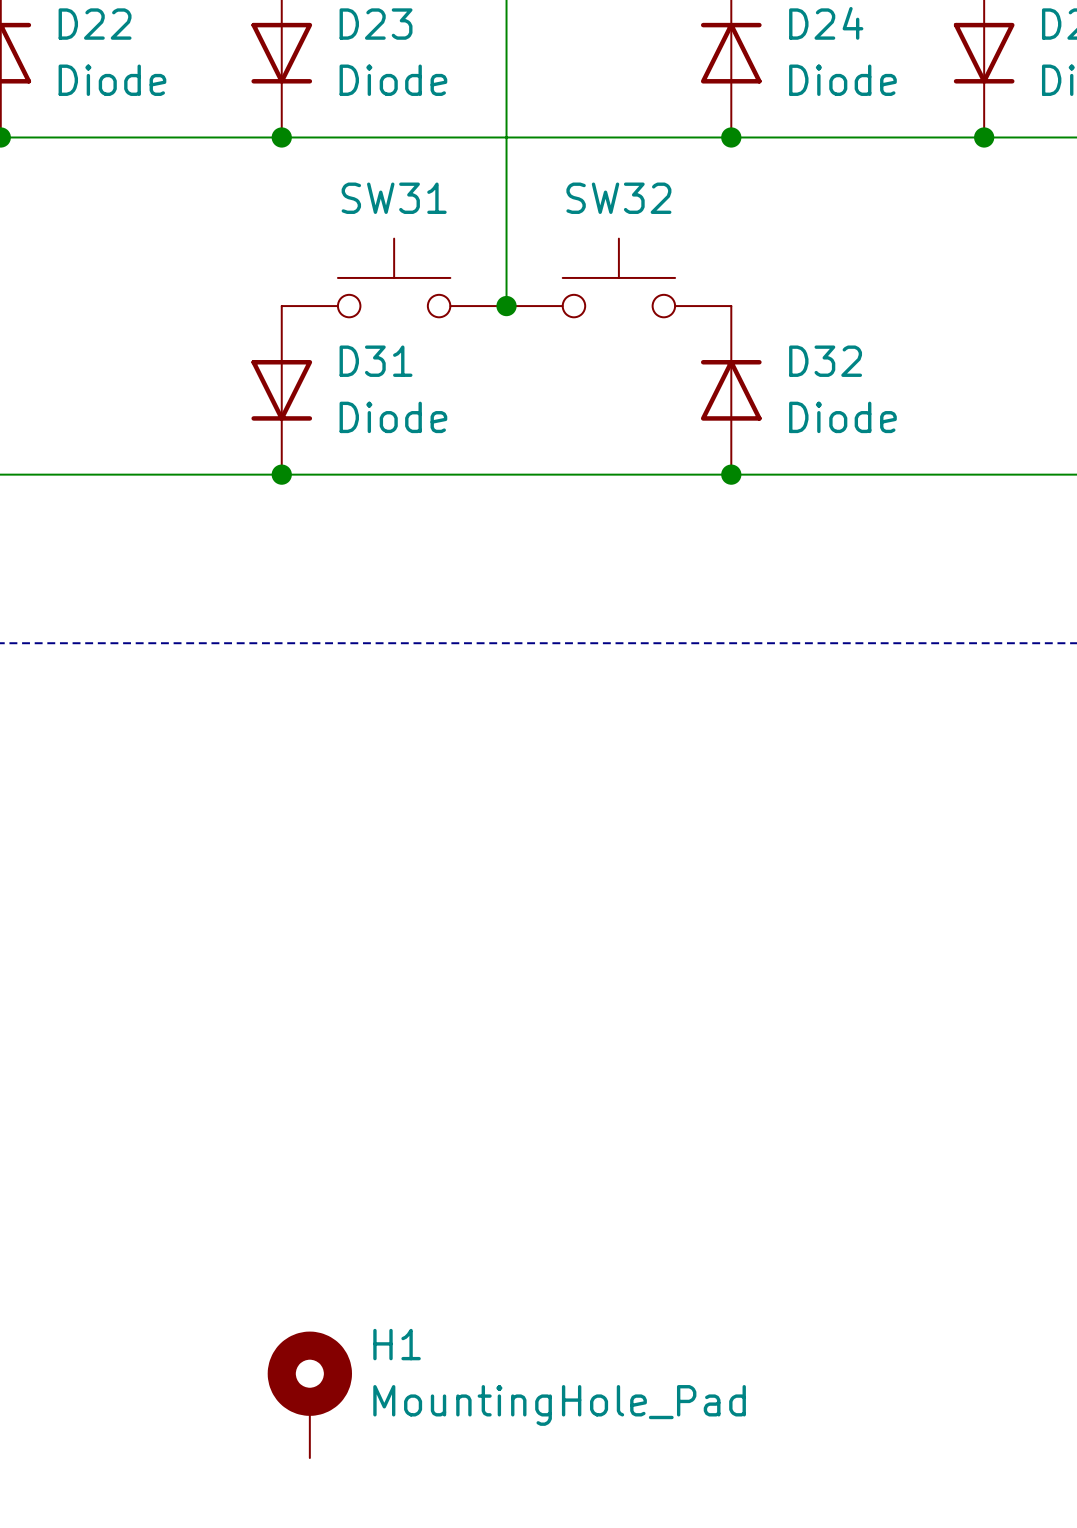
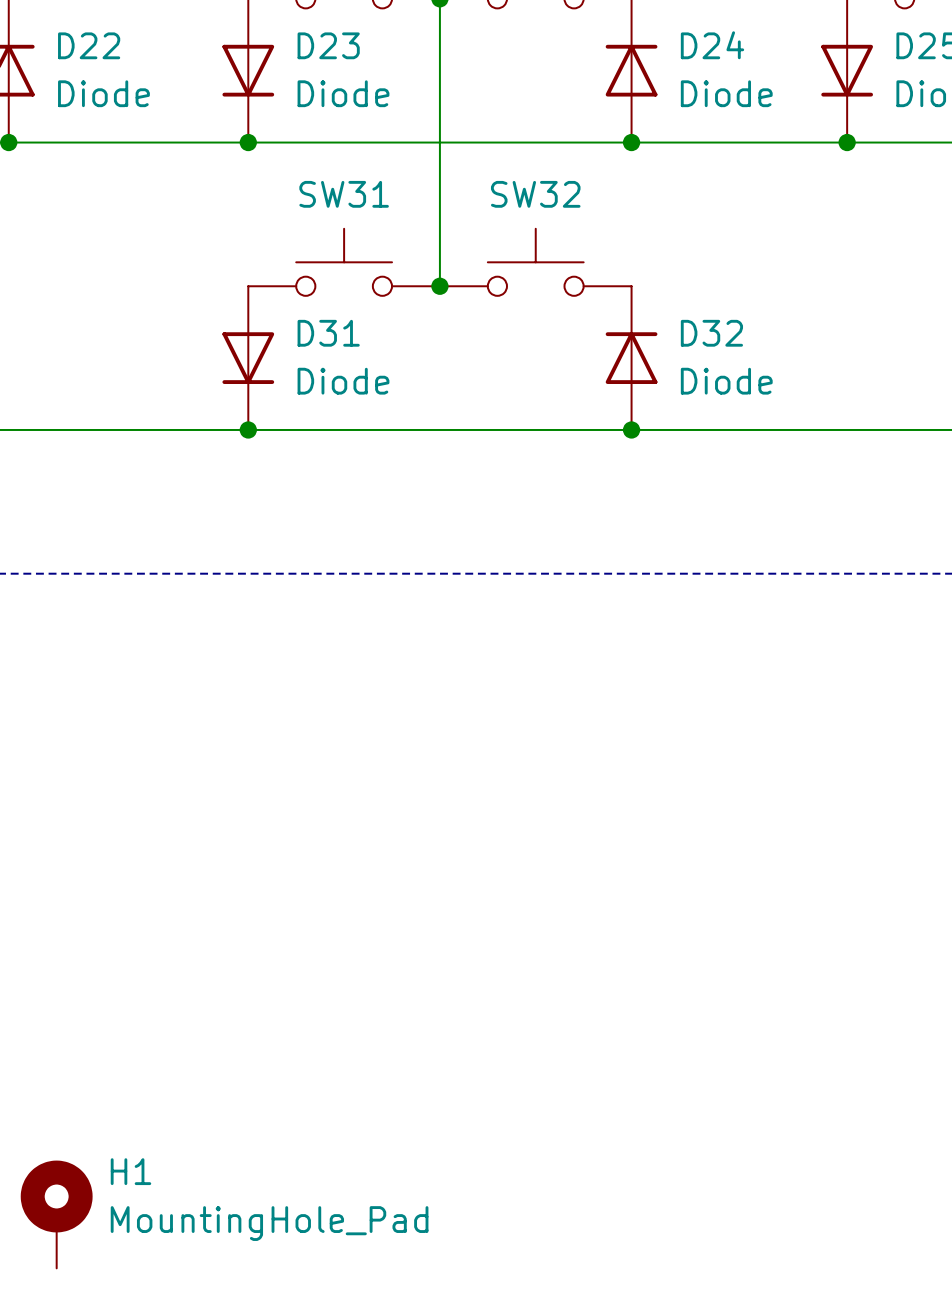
H1 position: (309, 1394) -> (56, 1214)

